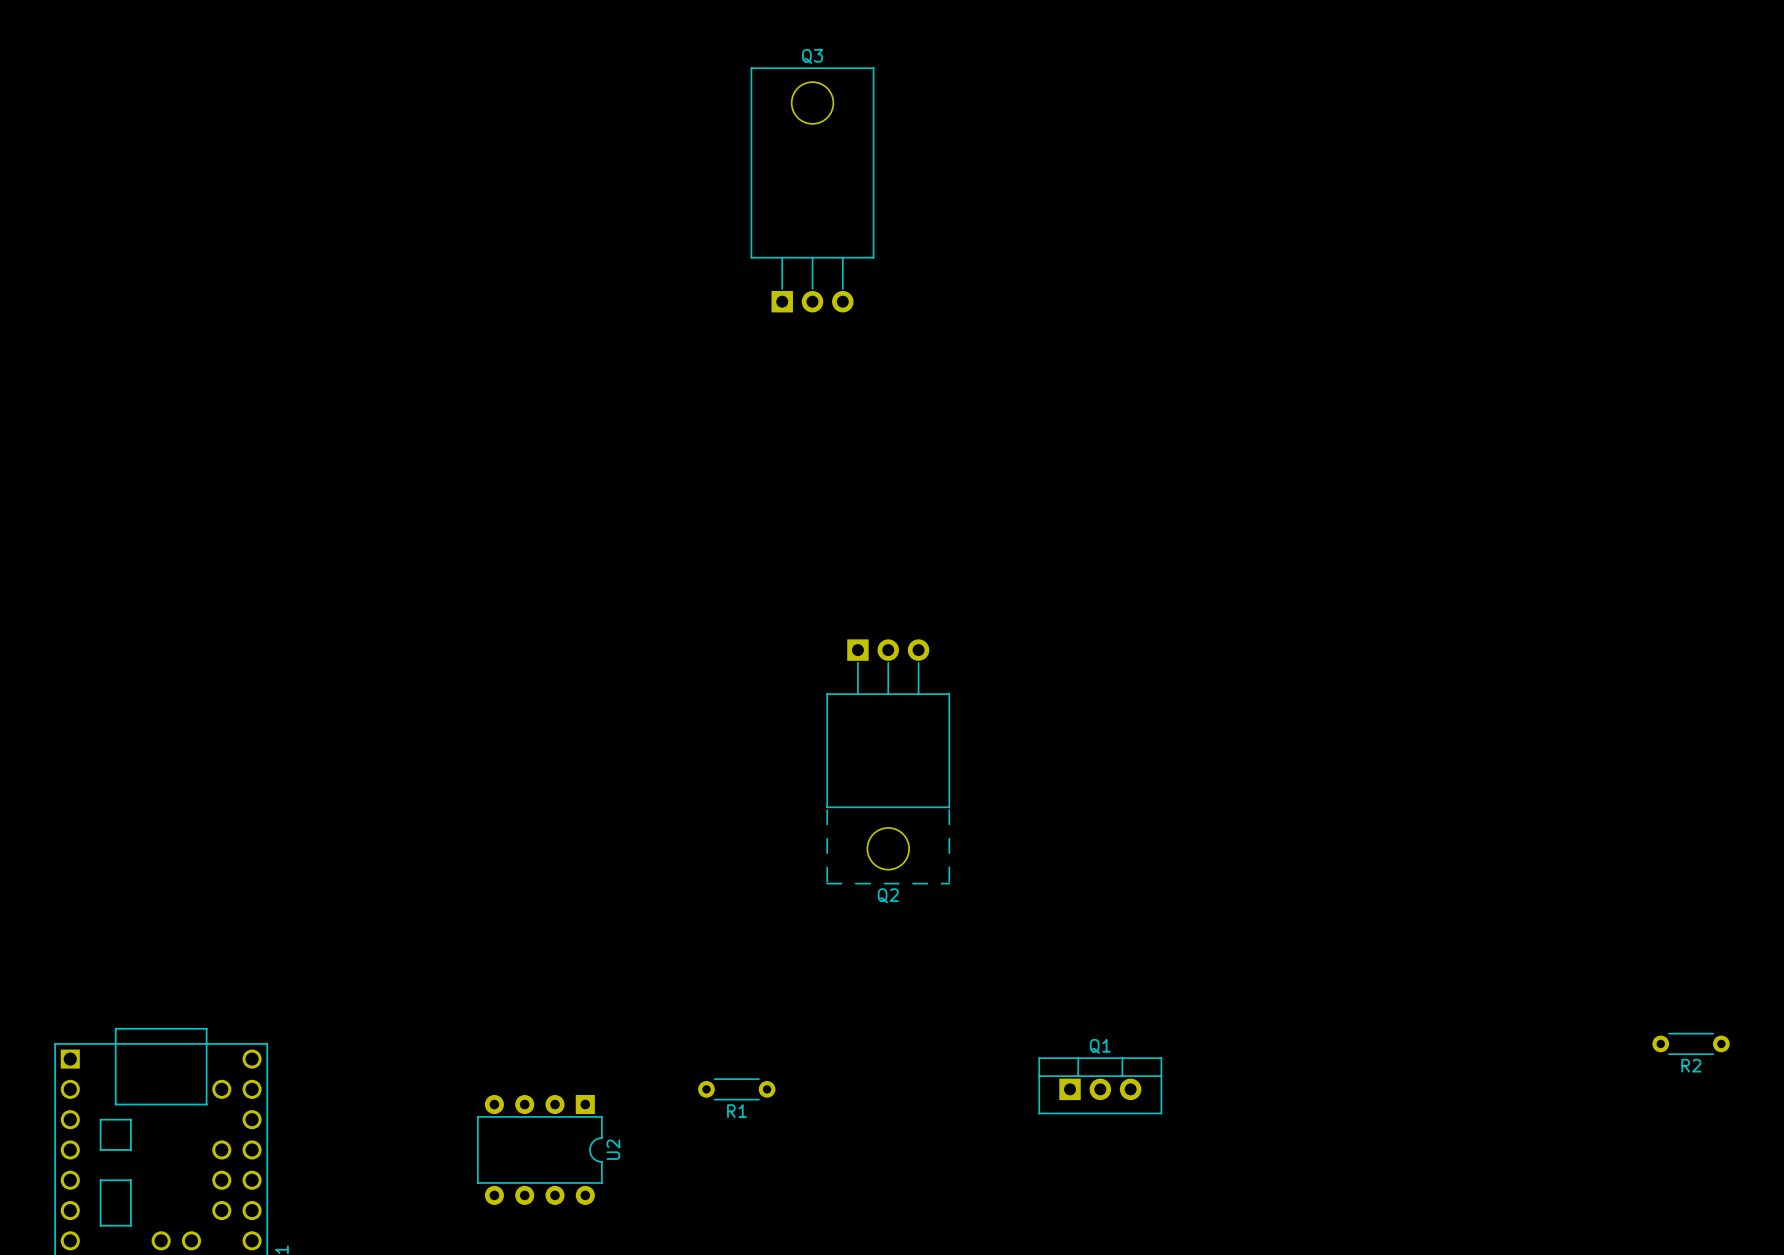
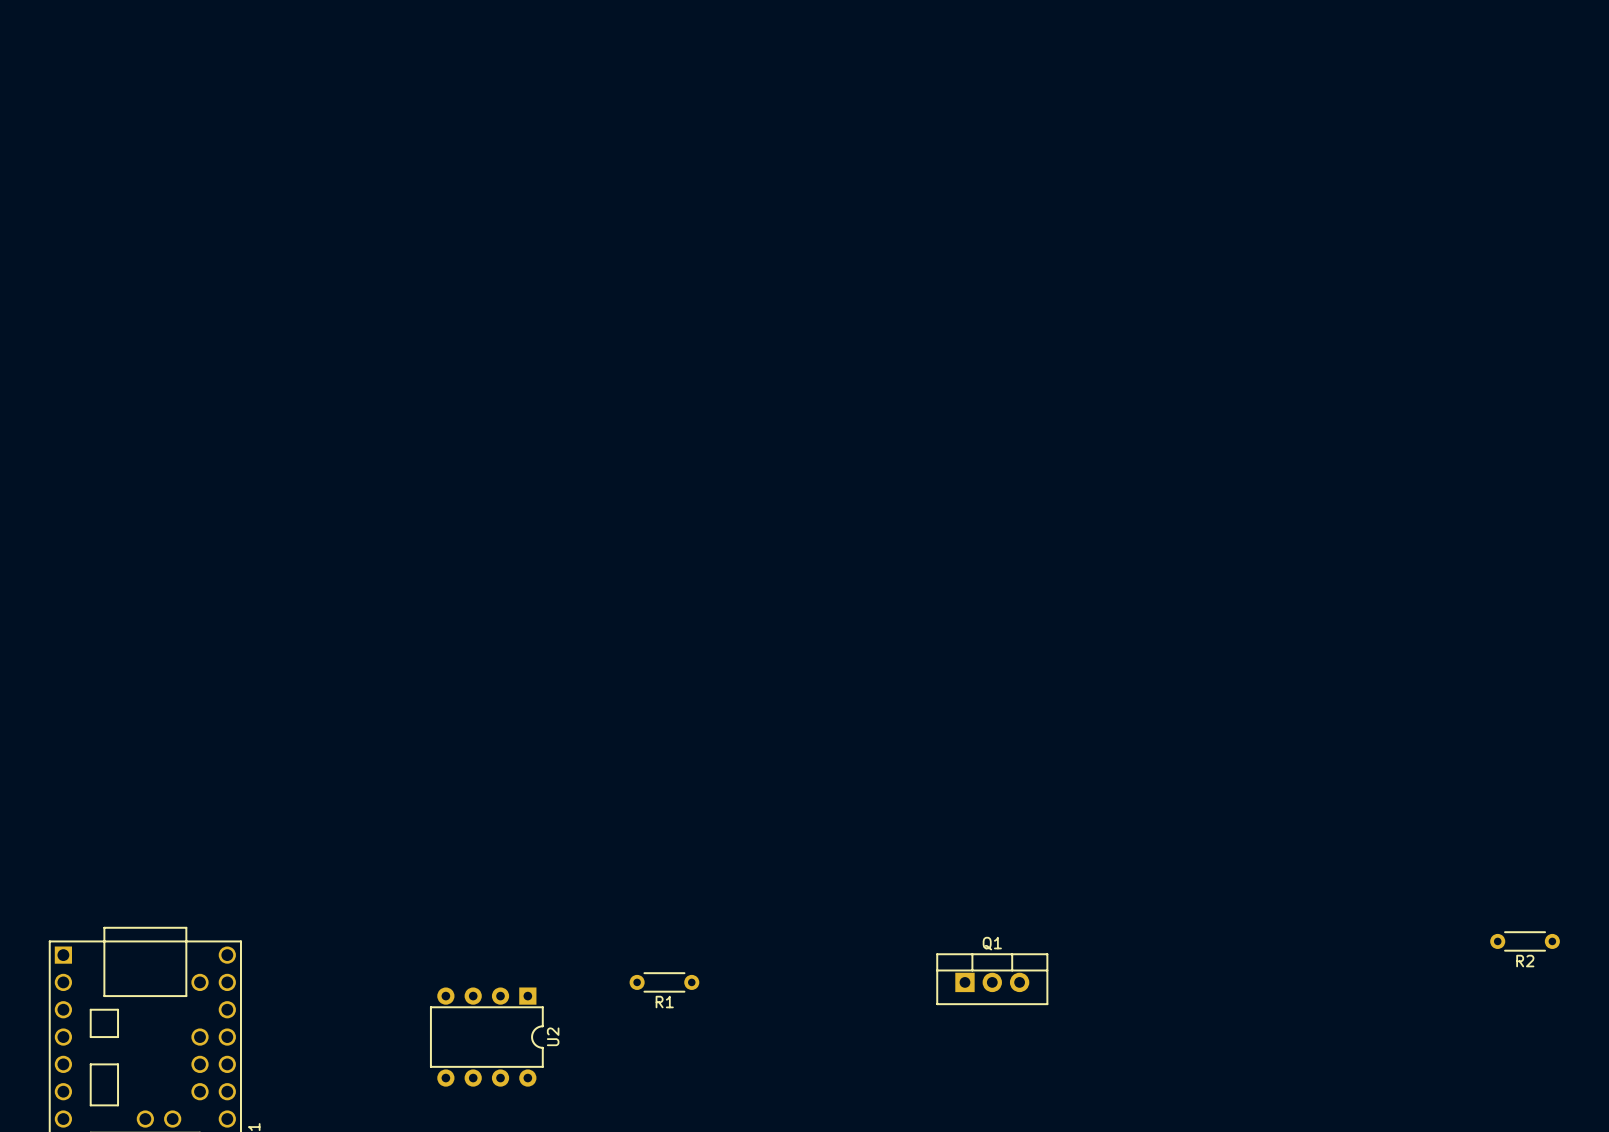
Q3: (812, 189) -> none
Q2: (888, 761) -> none

